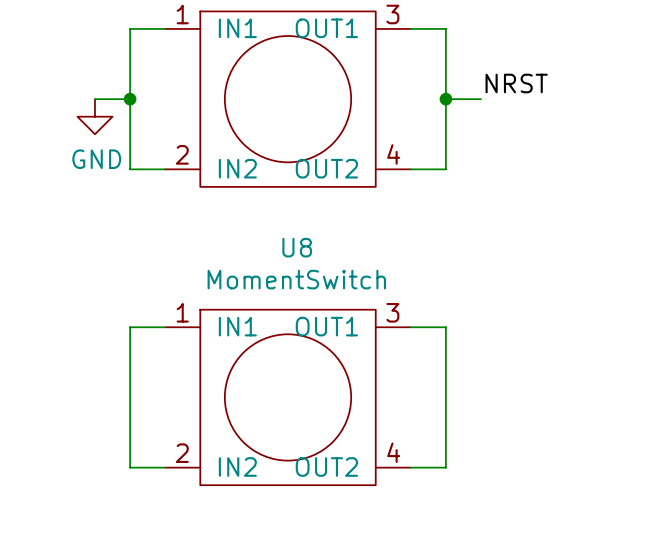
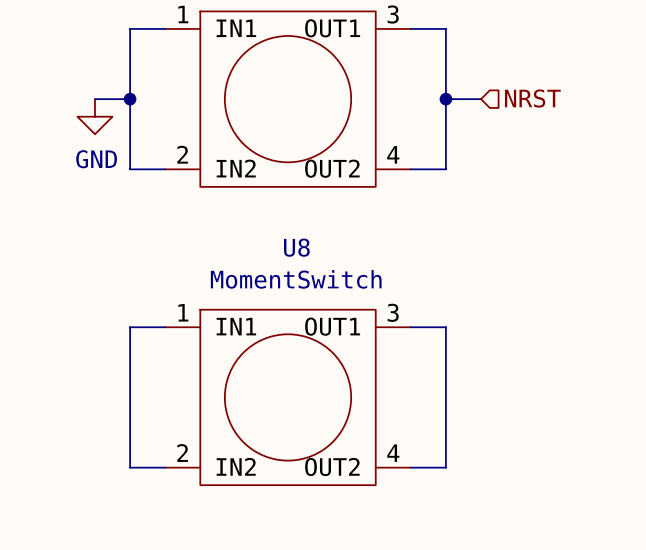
label: NRST (516, 83) -> none
hierarchical label: none -> NRST (532, 98)

